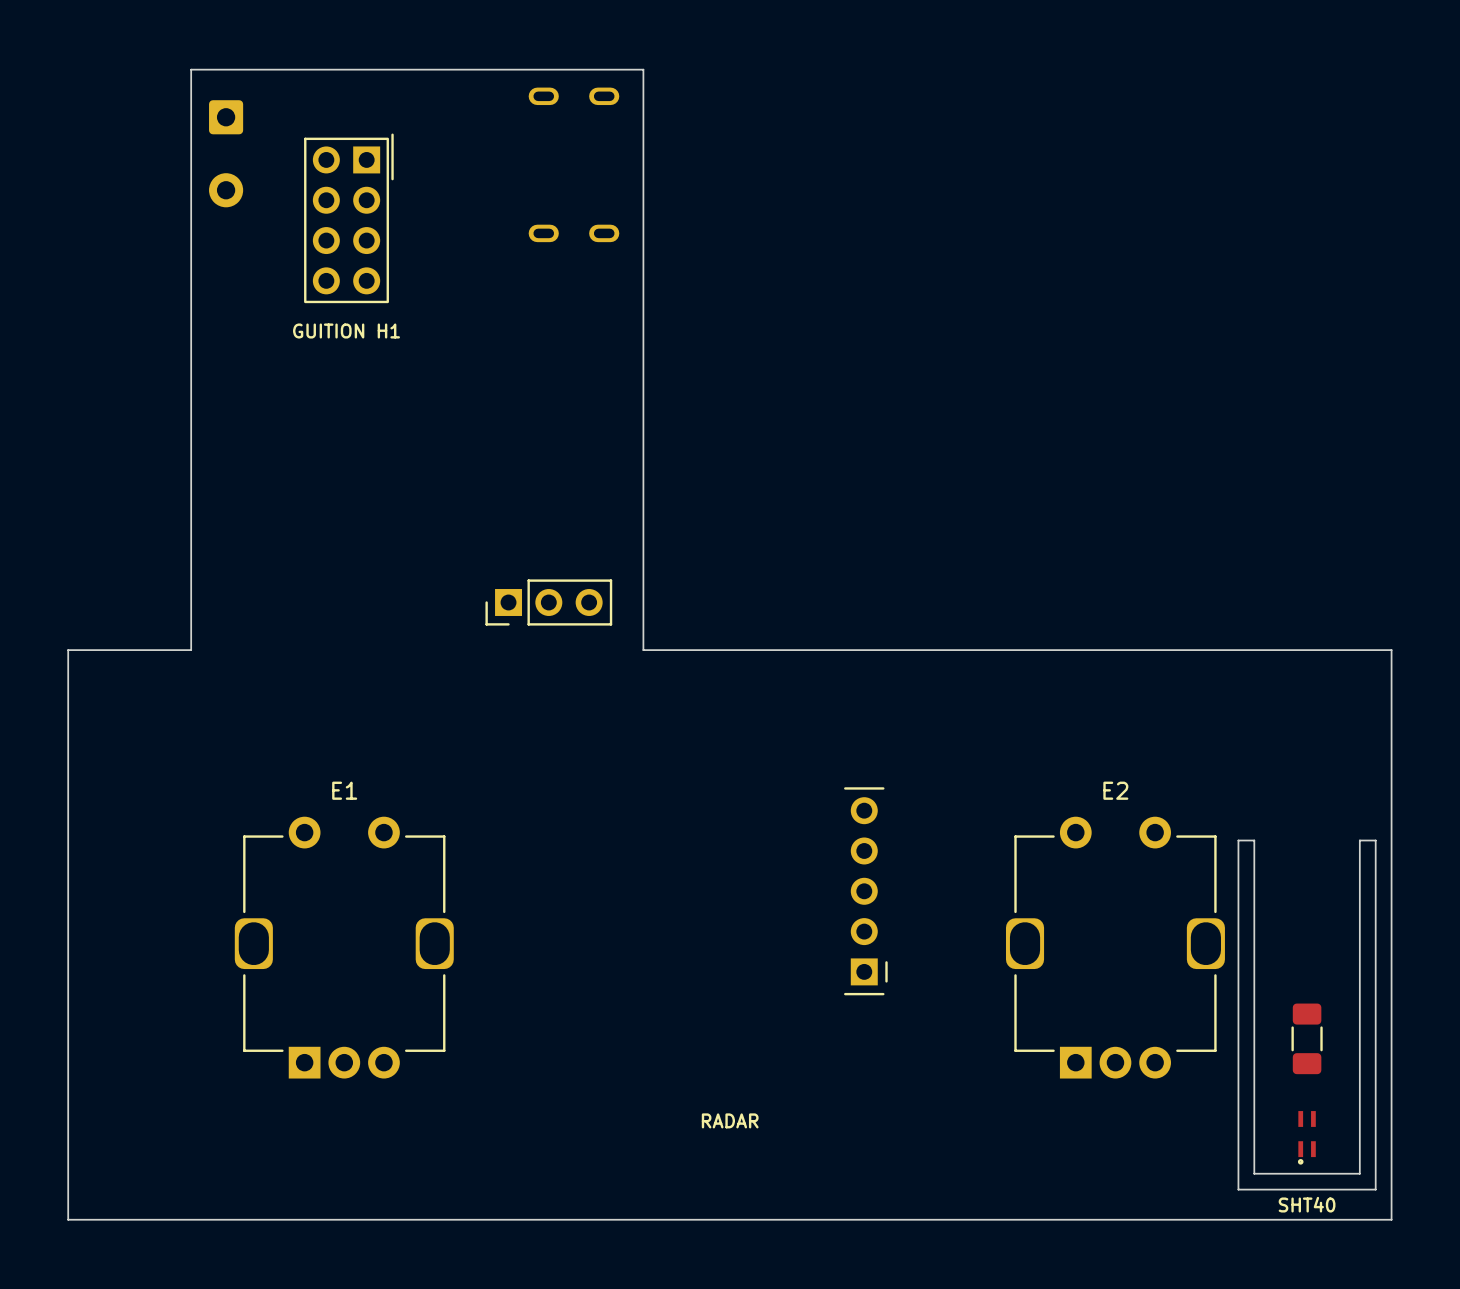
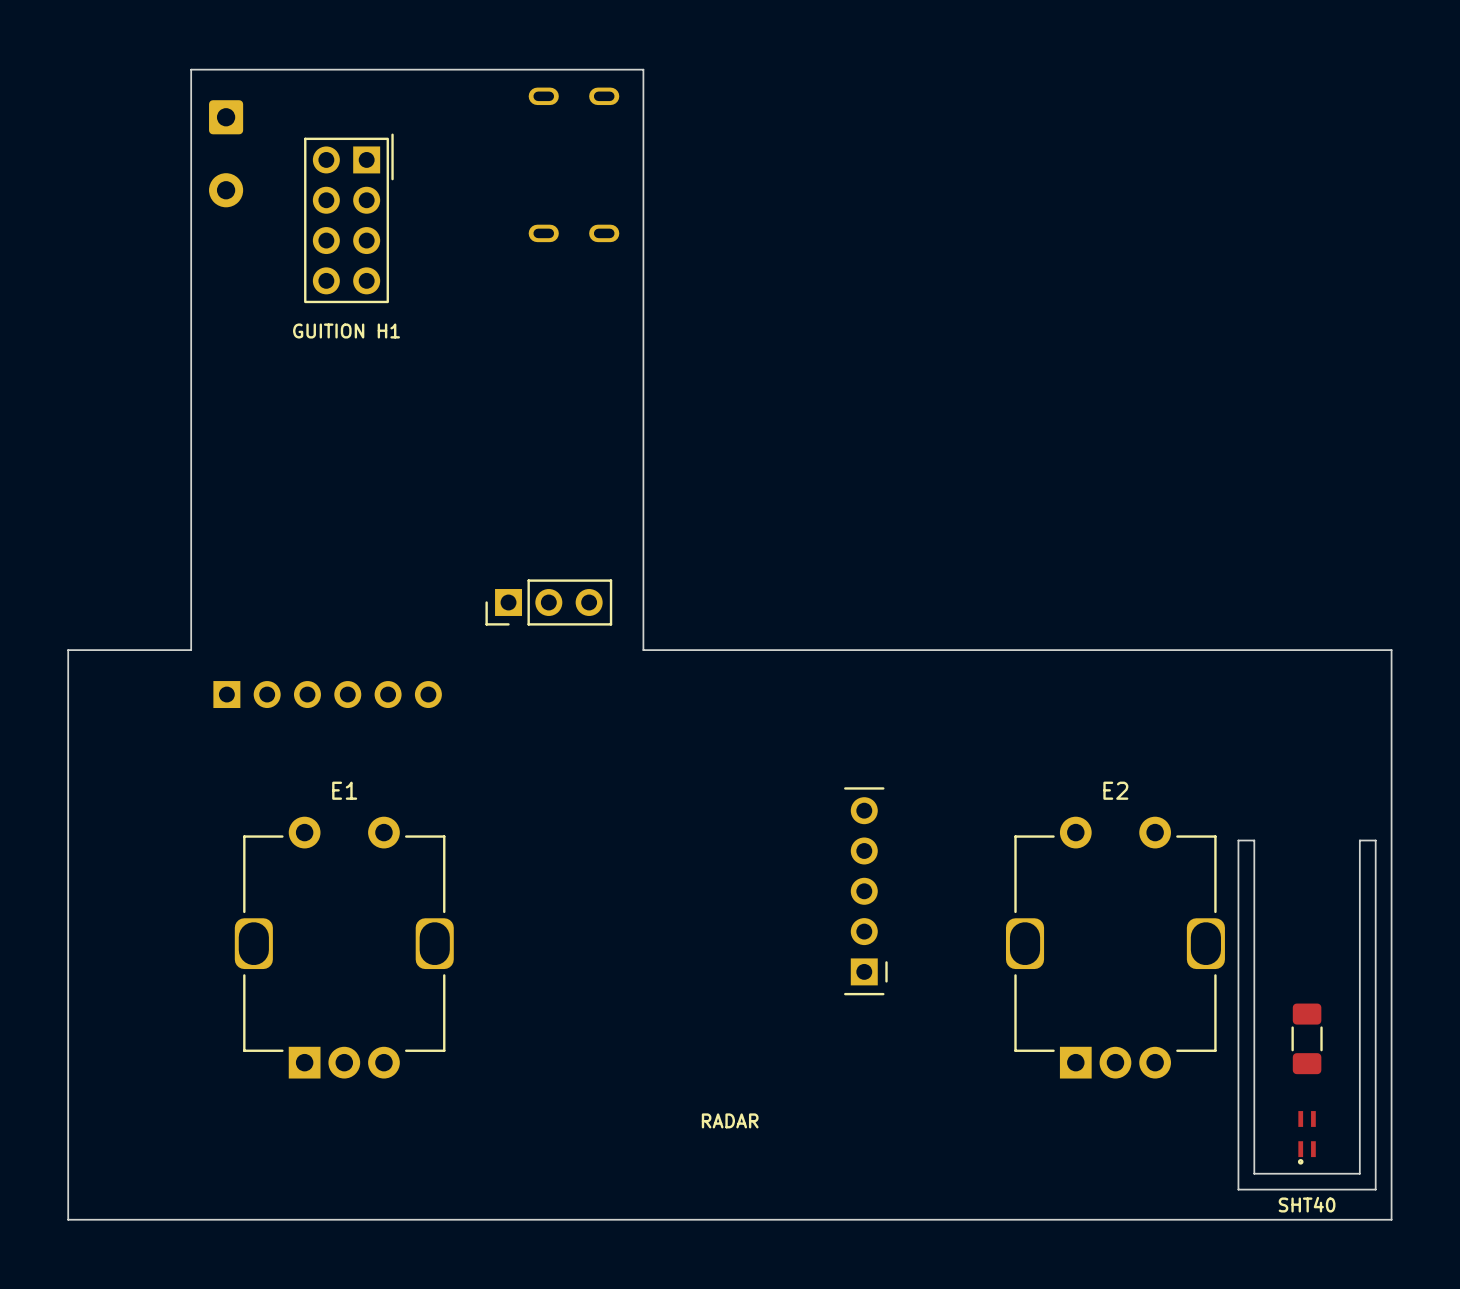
part: none -> (327, 694)

